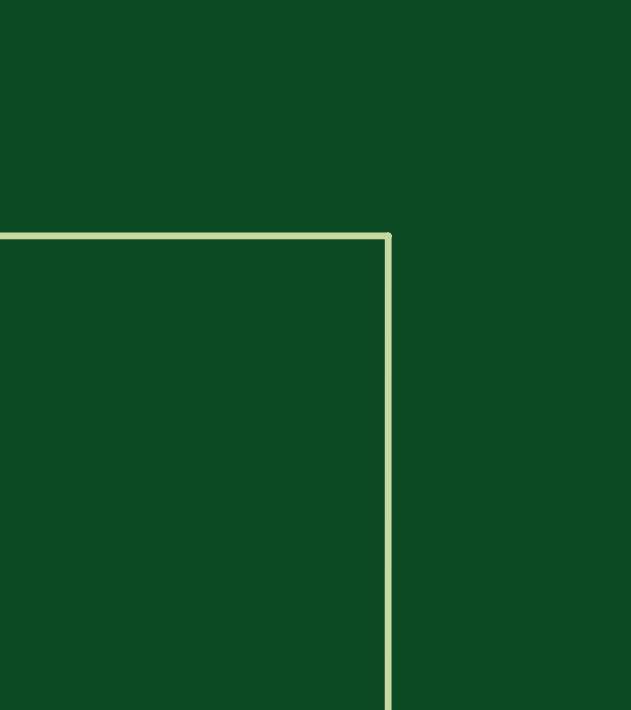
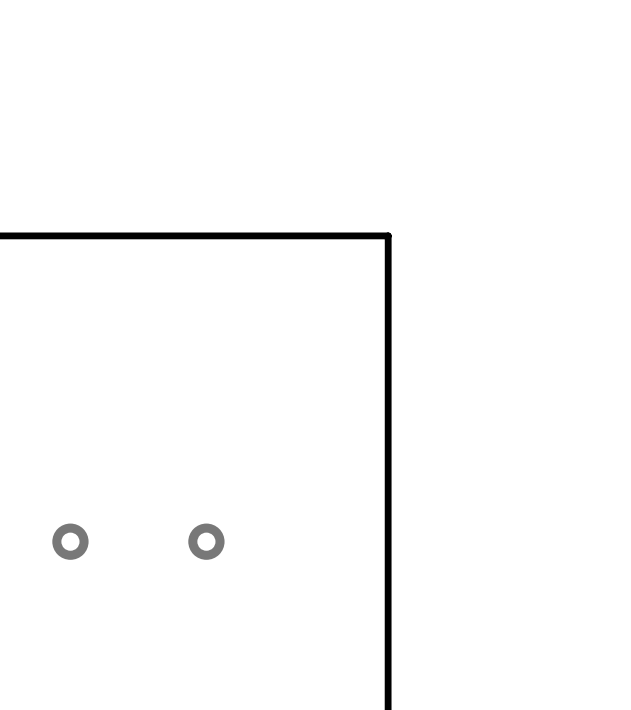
via: none -> (70, 541)
via: none -> (206, 541)

